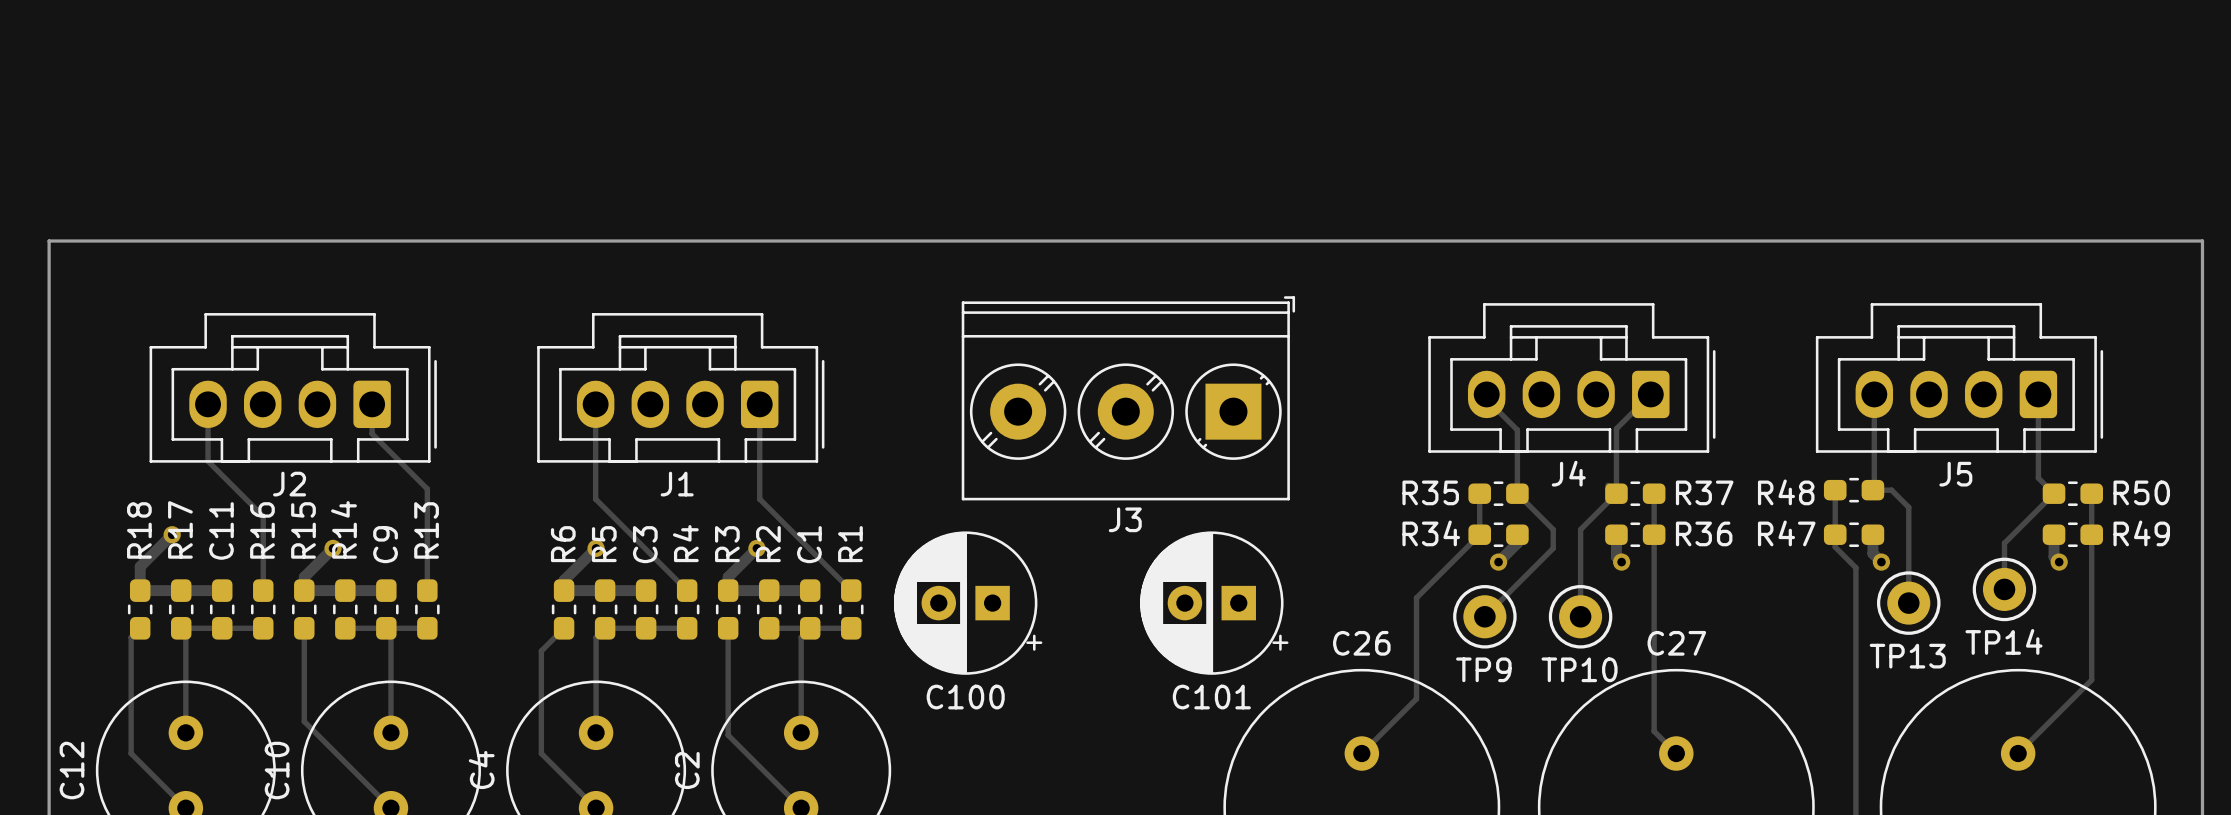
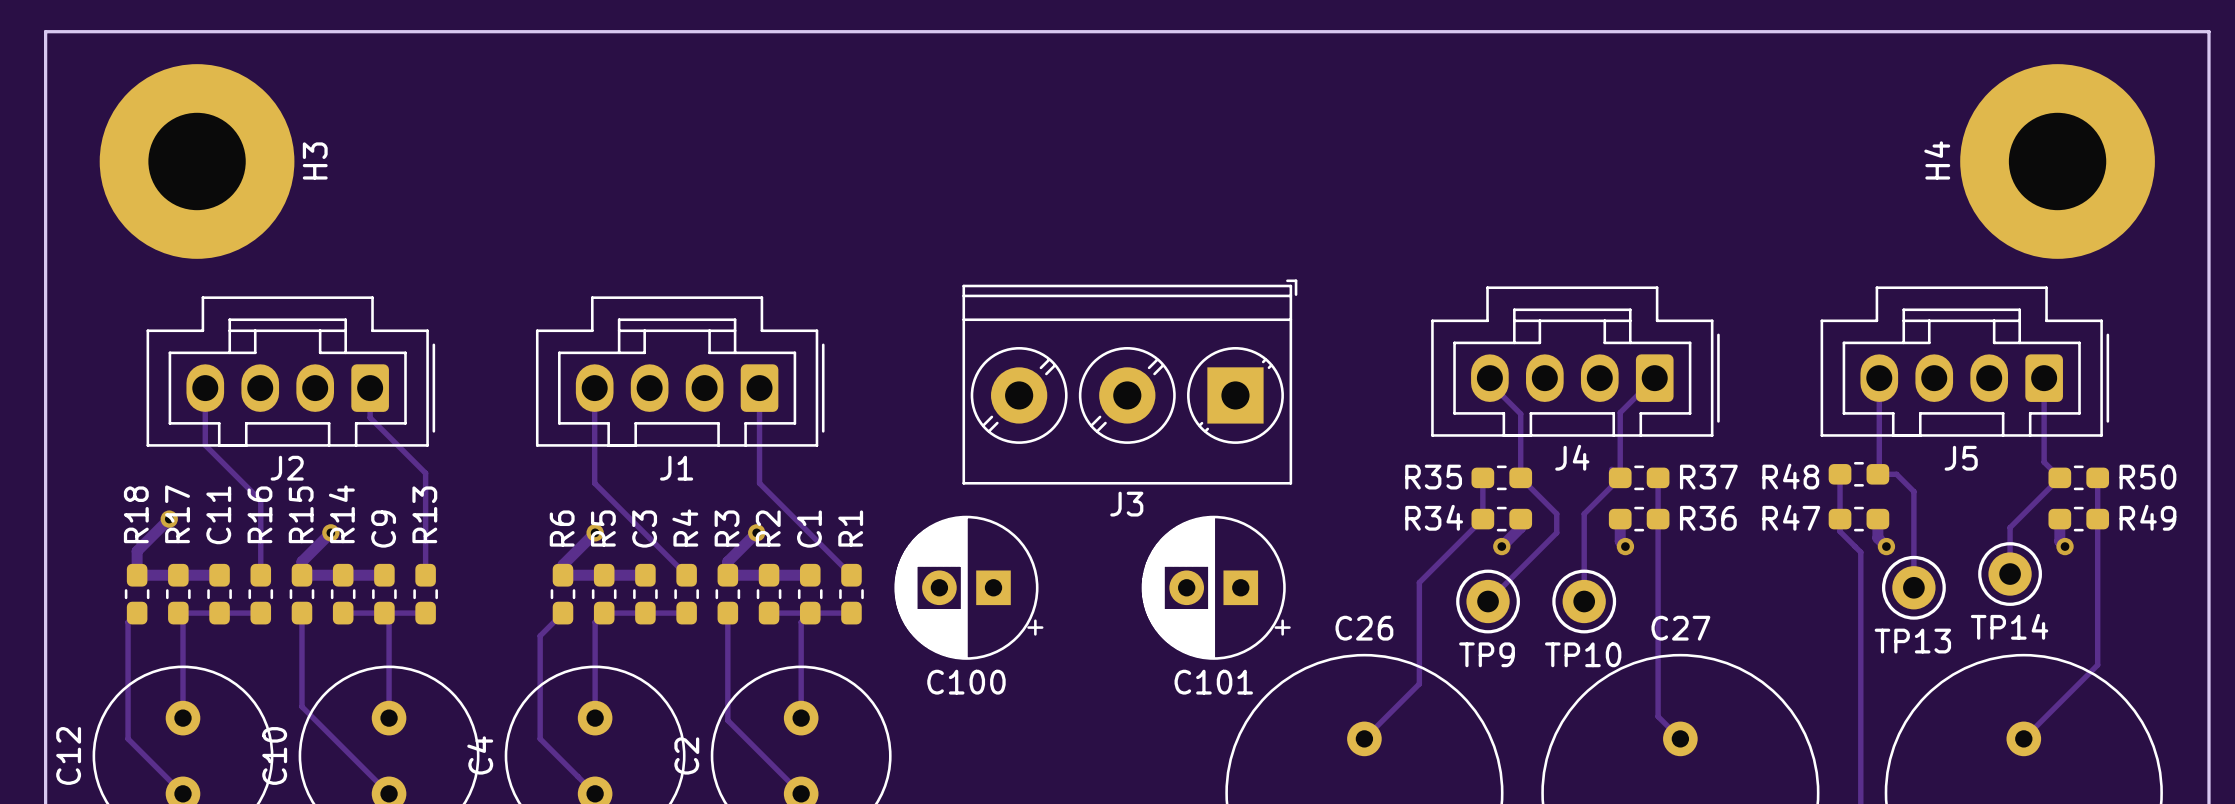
H3: none -> (197, 161)
H4: none -> (2057, 161)
board edge: (49, 241) (2202, 241) -> (45, 224) (45, 31) (2208, 31) (2208, 224)

